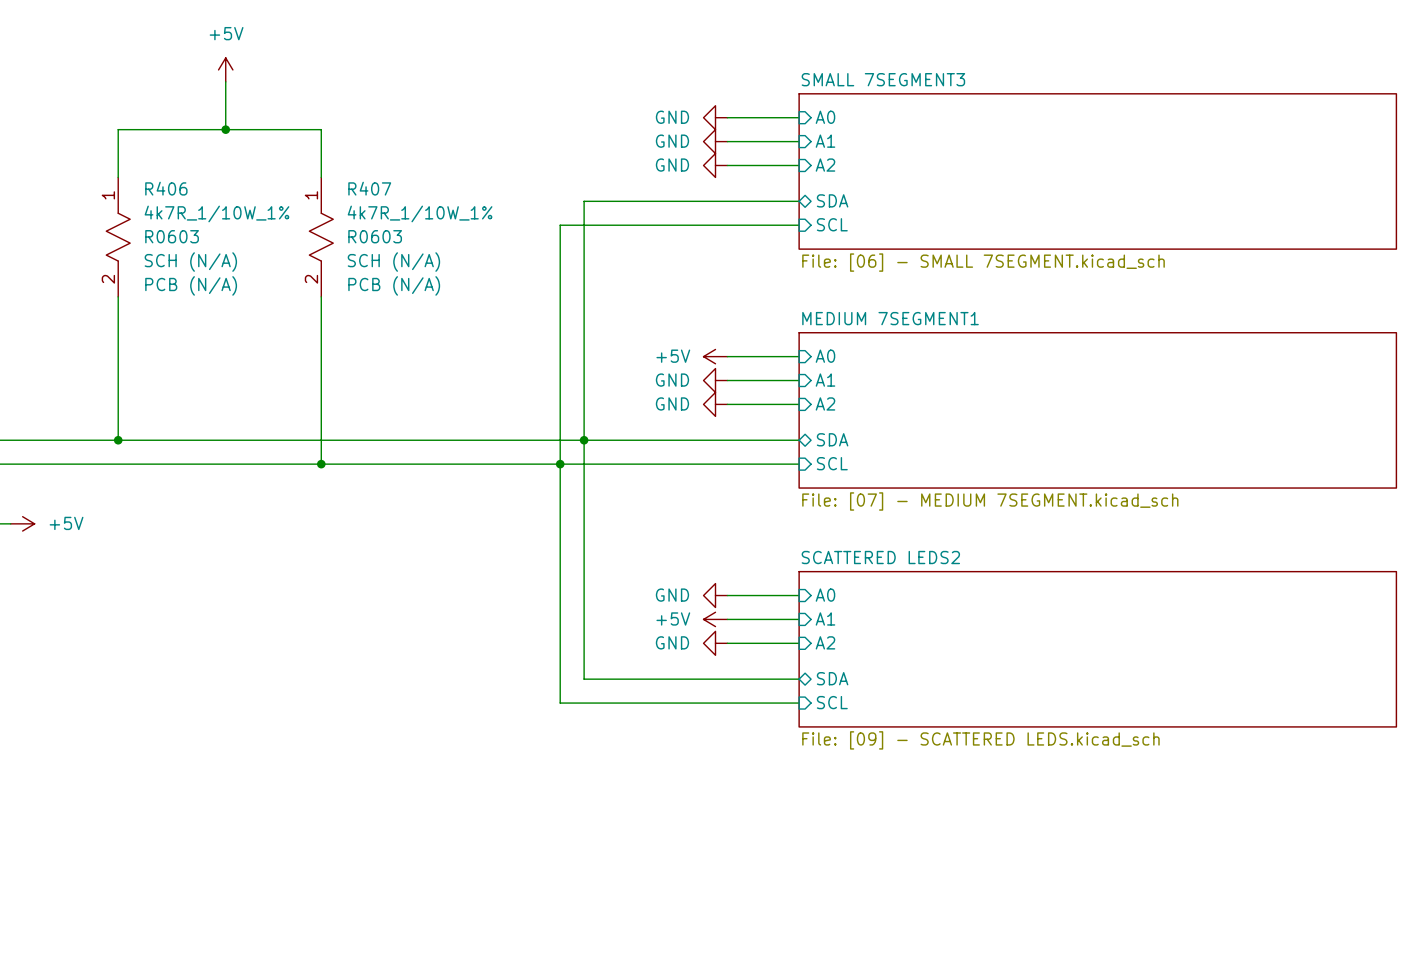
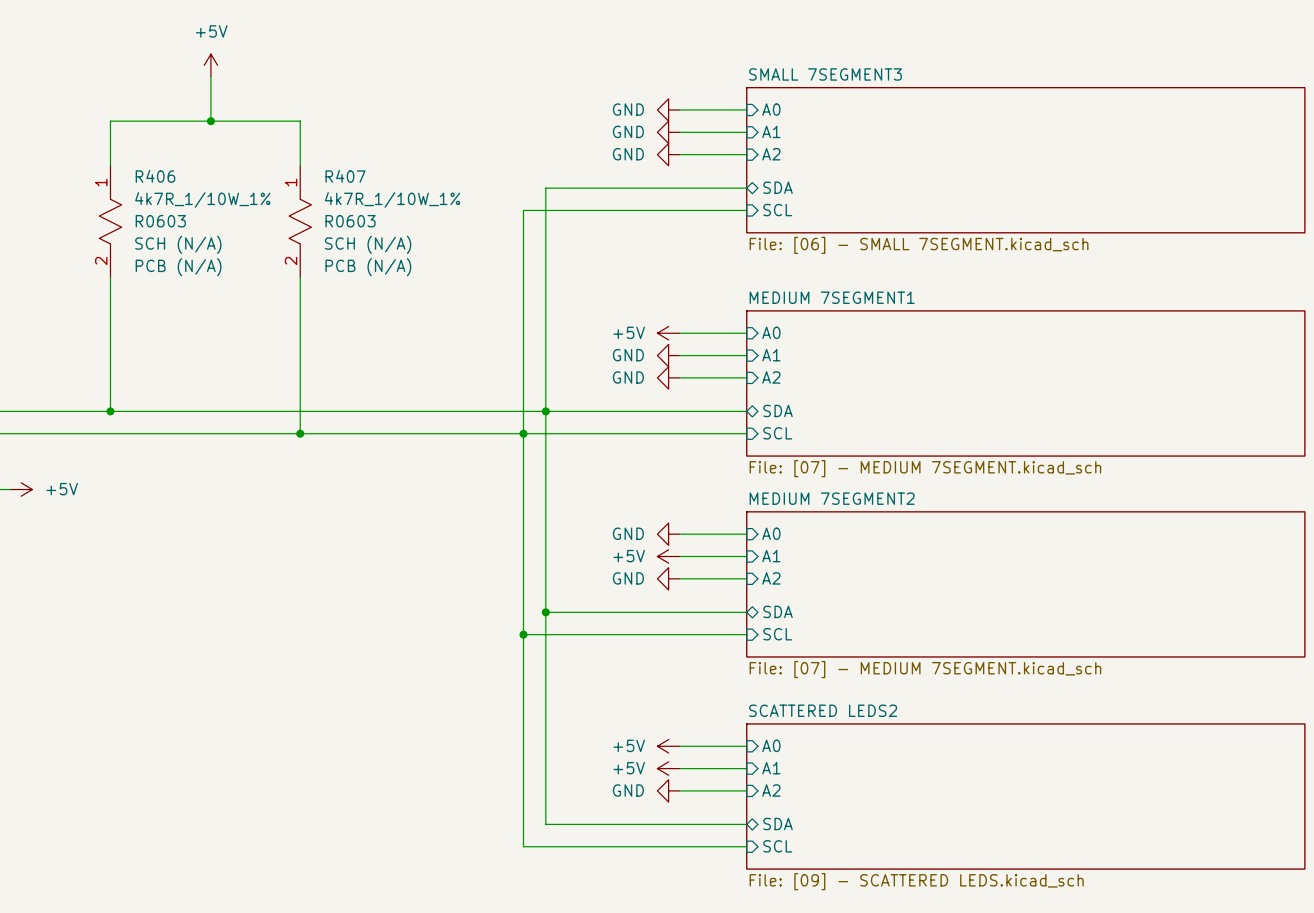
sheet pin: none -> A0 (771, 533)
power symbol: GND (715, 595) -> +5V (668, 556)
sheet pin: A0 (825, 595) -> A1 (771, 556)
sheet pin: A1 (825, 618) -> A2 (771, 578)
power symbol: +5V (715, 619) -> GND (668, 578)
sheet MEDIUM 7SEGMENT2: none -> File: [07] - MEDIUM 7SEGMENT.kicad_sch (1025, 584)
sheet pin position: A2 (825, 642) -> A2 (771, 790)
power symbol position: GND (715, 643) -> GND (668, 534)
wire: (727, 643) (799, 643) -> (679, 534) (746, 534)
sheet SCATTERED LEDS2 position: (1097, 649) -> (1025, 796)
sheet pin: none -> SDA (778, 611)
wire: none -> (545, 612) (746, 612)
junction: none -> (545, 612)
sheet pin shape: bidirectional (832, 678) -> input (777, 634)
sheet pin: SDA (832, 678) -> SCL (777, 634)
wire: none -> (523, 634) (545, 634) (545, 824) (746, 824)
junction: none -> (523, 634)
sheet pin position: SCL (832, 702) -> SCL (777, 846)
wire: (560, 703) (799, 703) -> (523, 656) (523, 846) (746, 846)
power symbol: none -> +5V (668, 746)
wire: none -> (679, 746) (746, 746)
sheet pin: none -> A0 (771, 745)
power symbol: none -> +5V (668, 768)
wire: none -> (679, 768) (746, 768)
sheet pin: none -> A1 (771, 768)
power symbol: none -> GND (668, 790)
wire: none -> (679, 790) (746, 790)
sheet pin: none -> SDA (778, 823)

